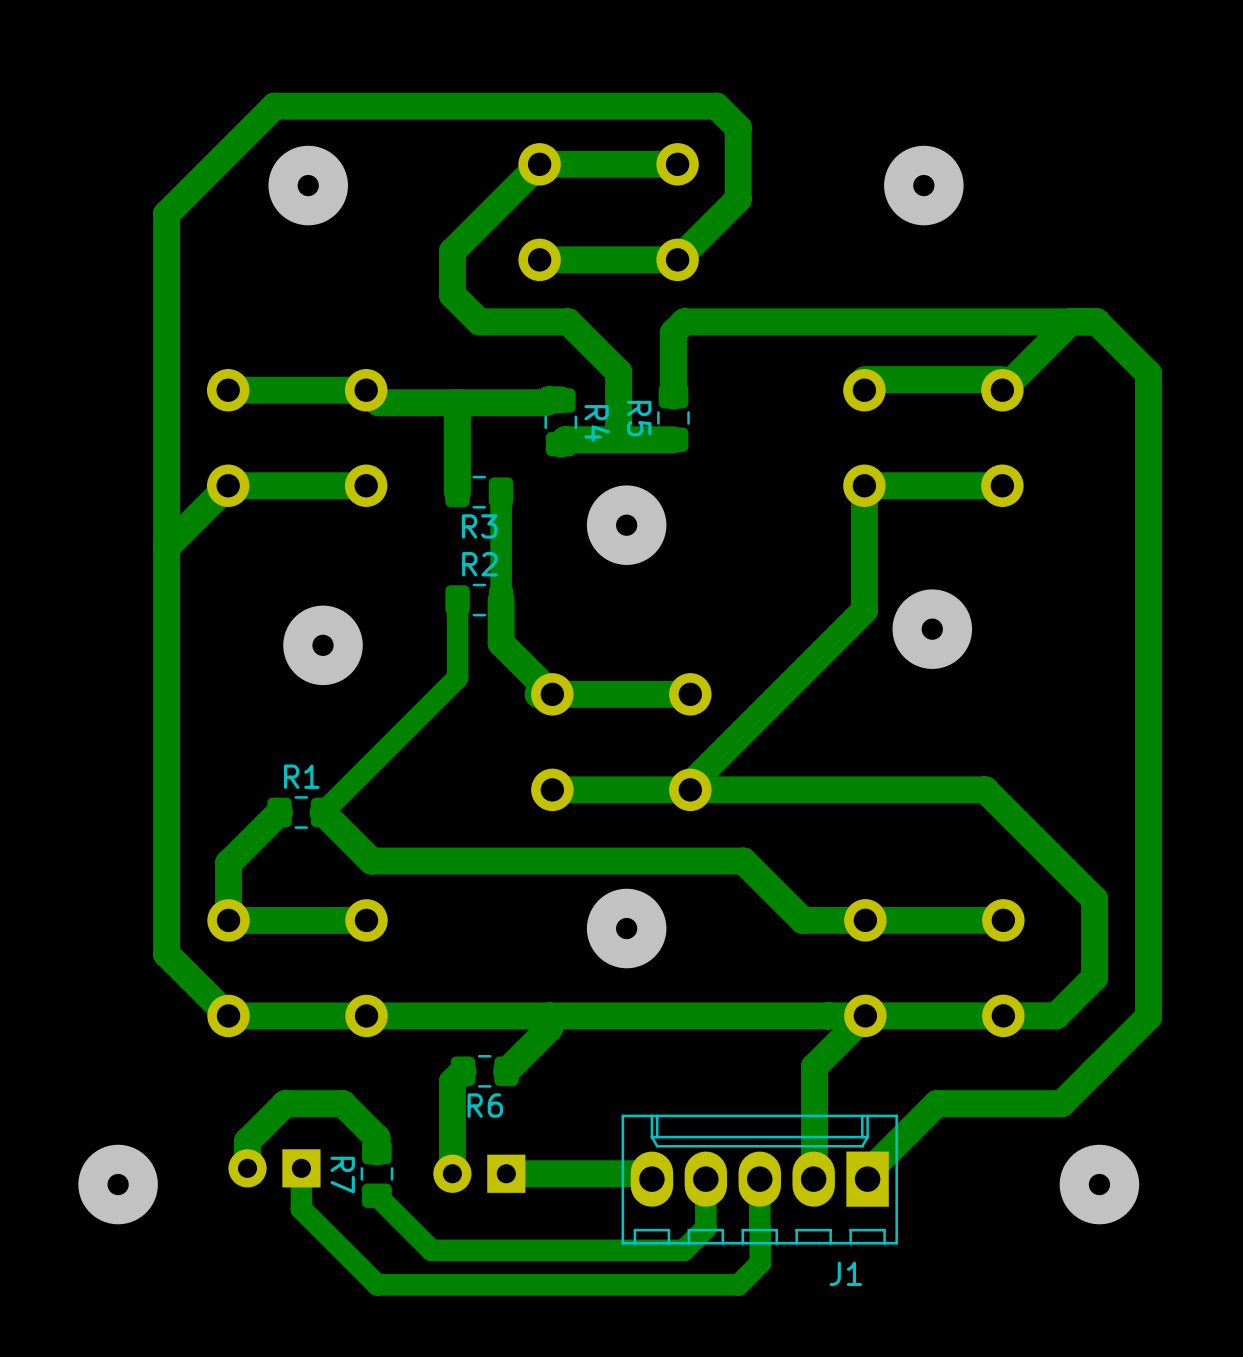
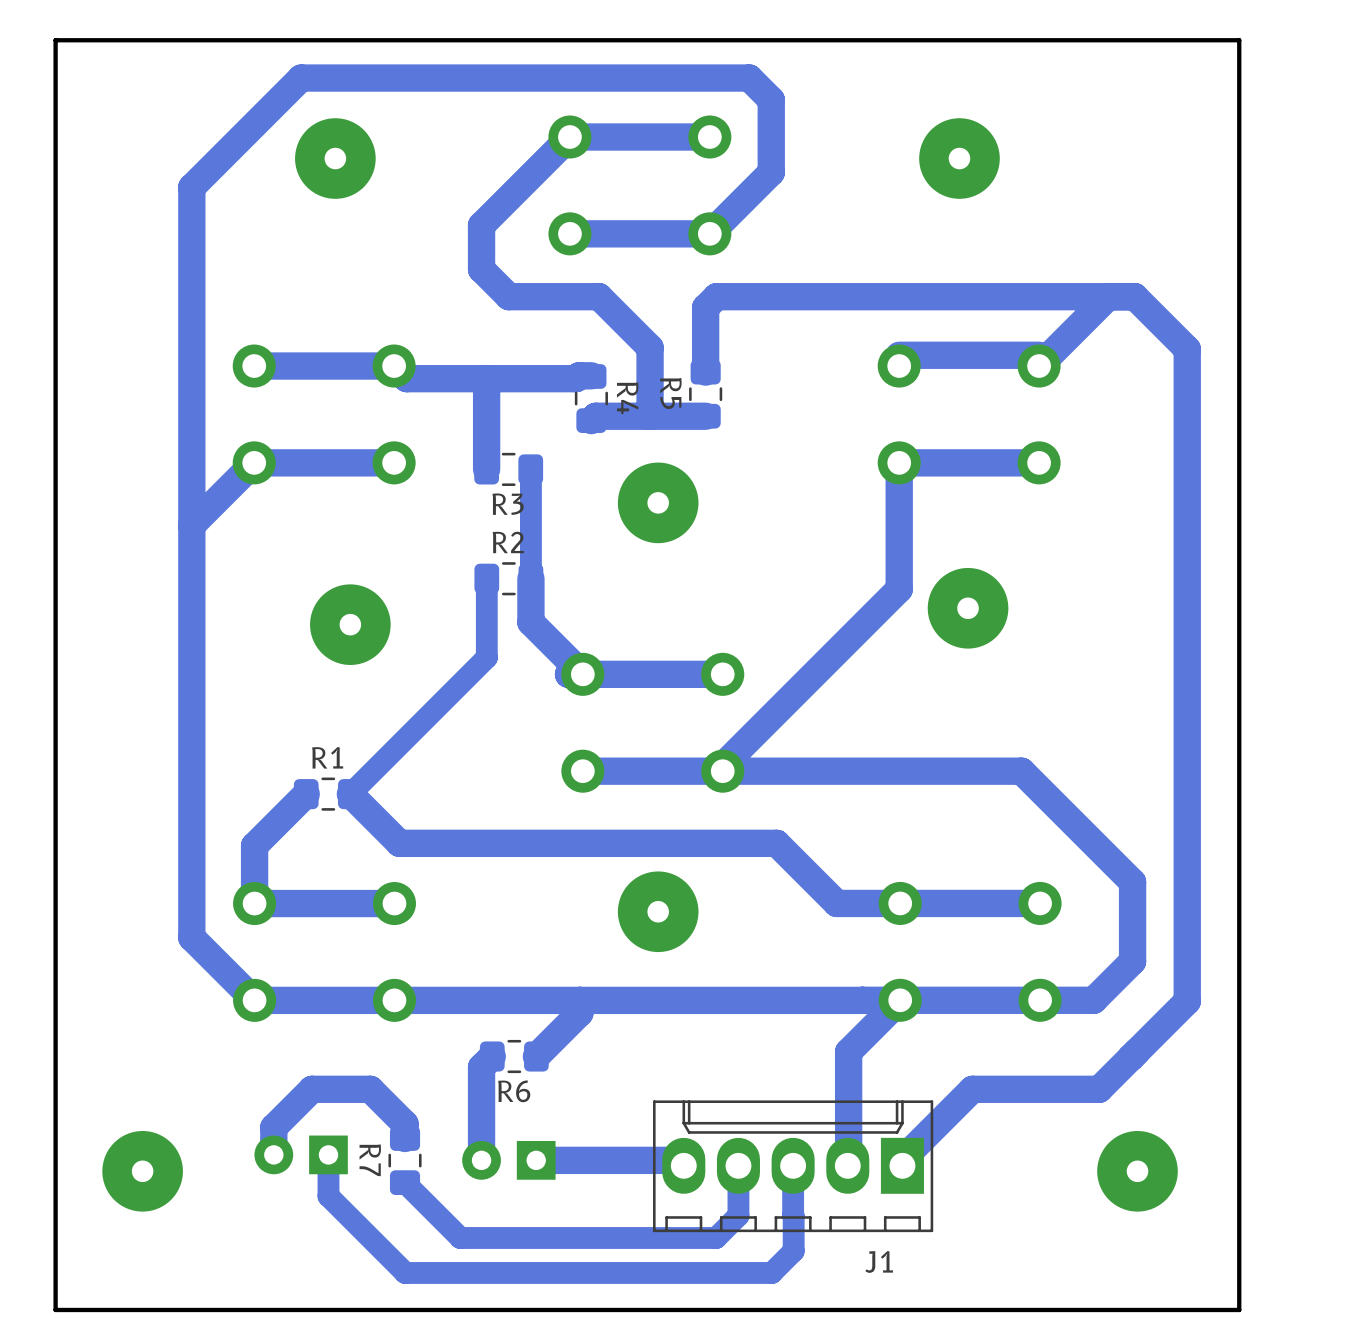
board edge: none -> (1239, 40) (1239, 1309) (55, 1309) (55, 40) (1239, 40)

